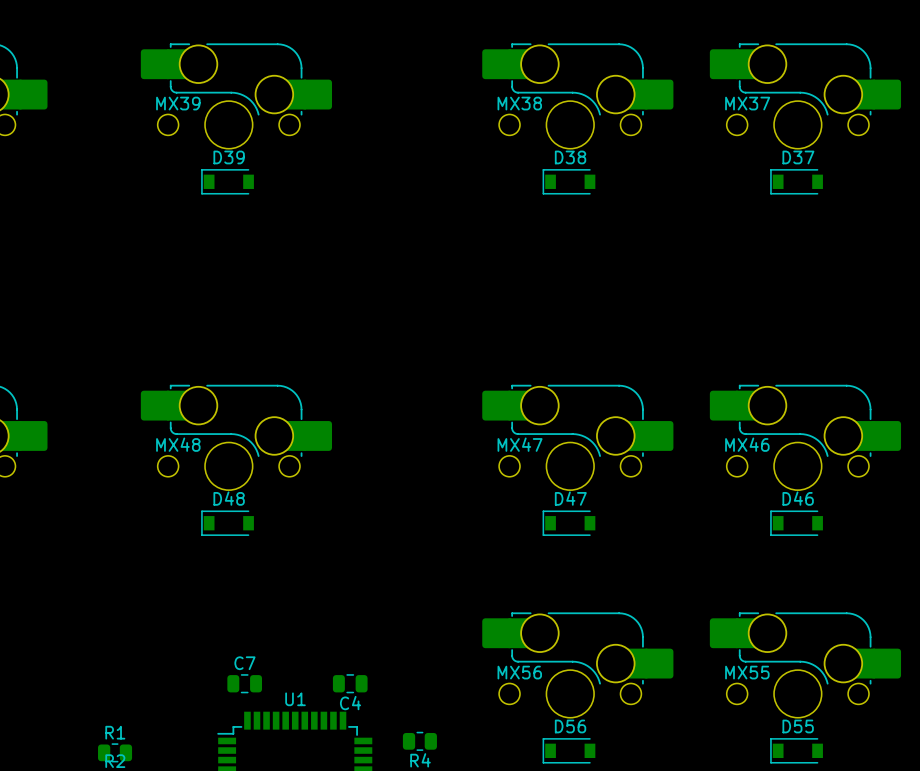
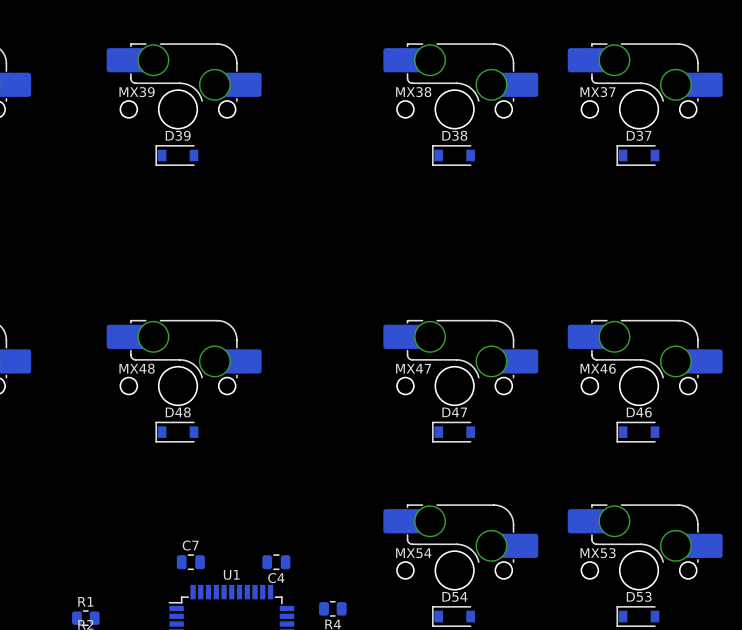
MX56 name: MX56 (519, 672) -> MX54 (413, 553)
MX55 name: MX55 (747, 672) -> MX53 (598, 553)
D56 name: D56 (570, 726) -> D54 (454, 596)
D55 name: D55 (798, 726) -> D53 (639, 596)

